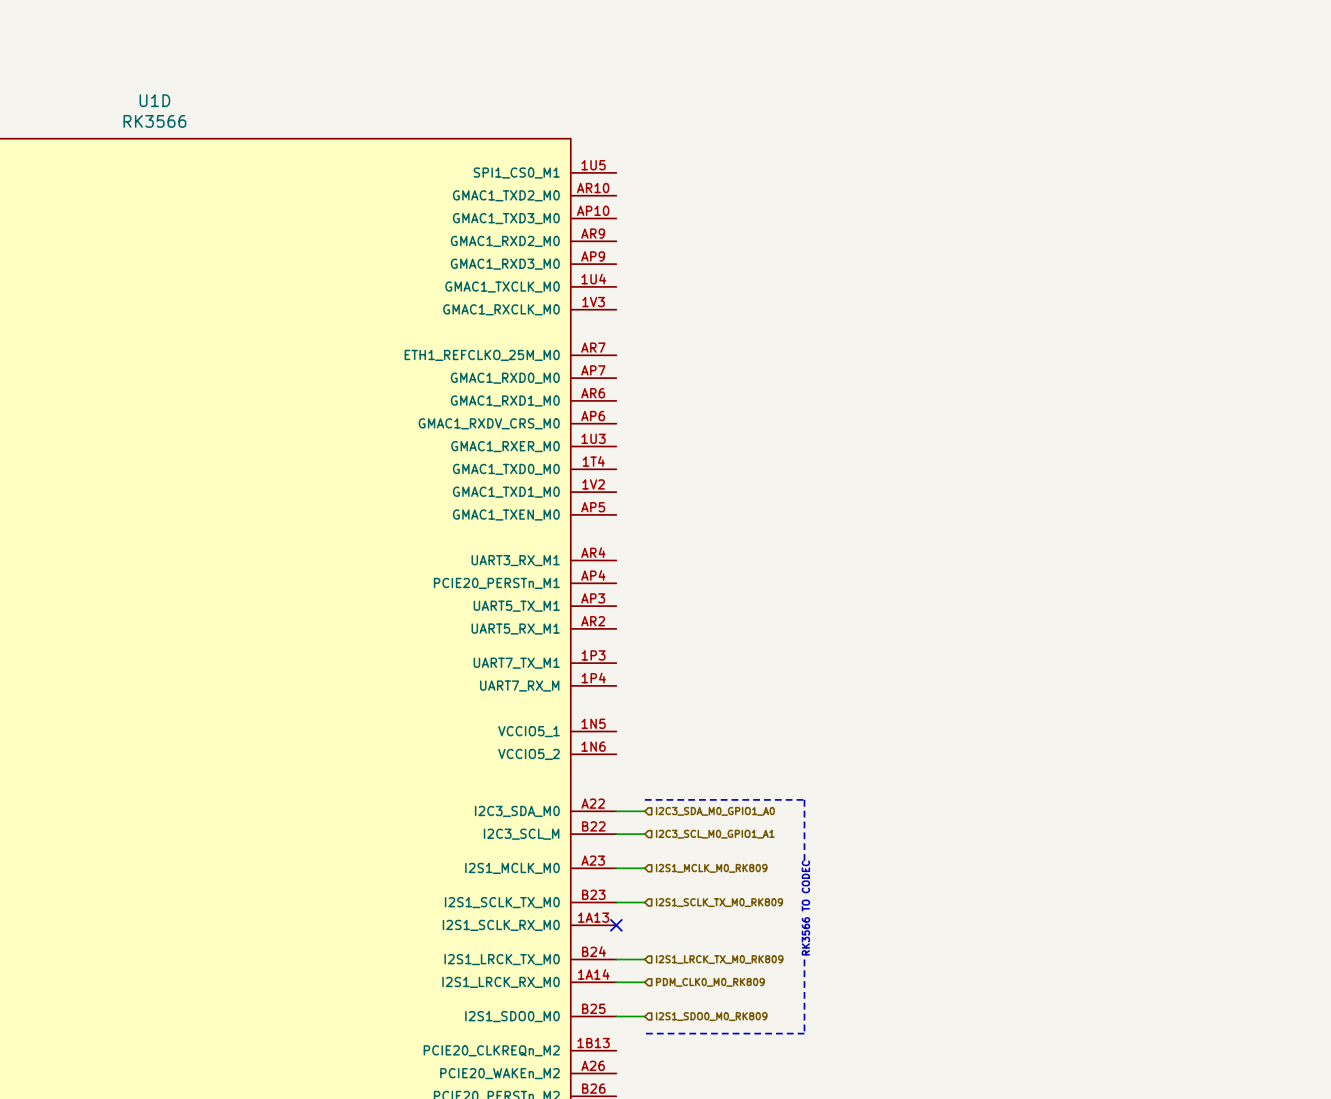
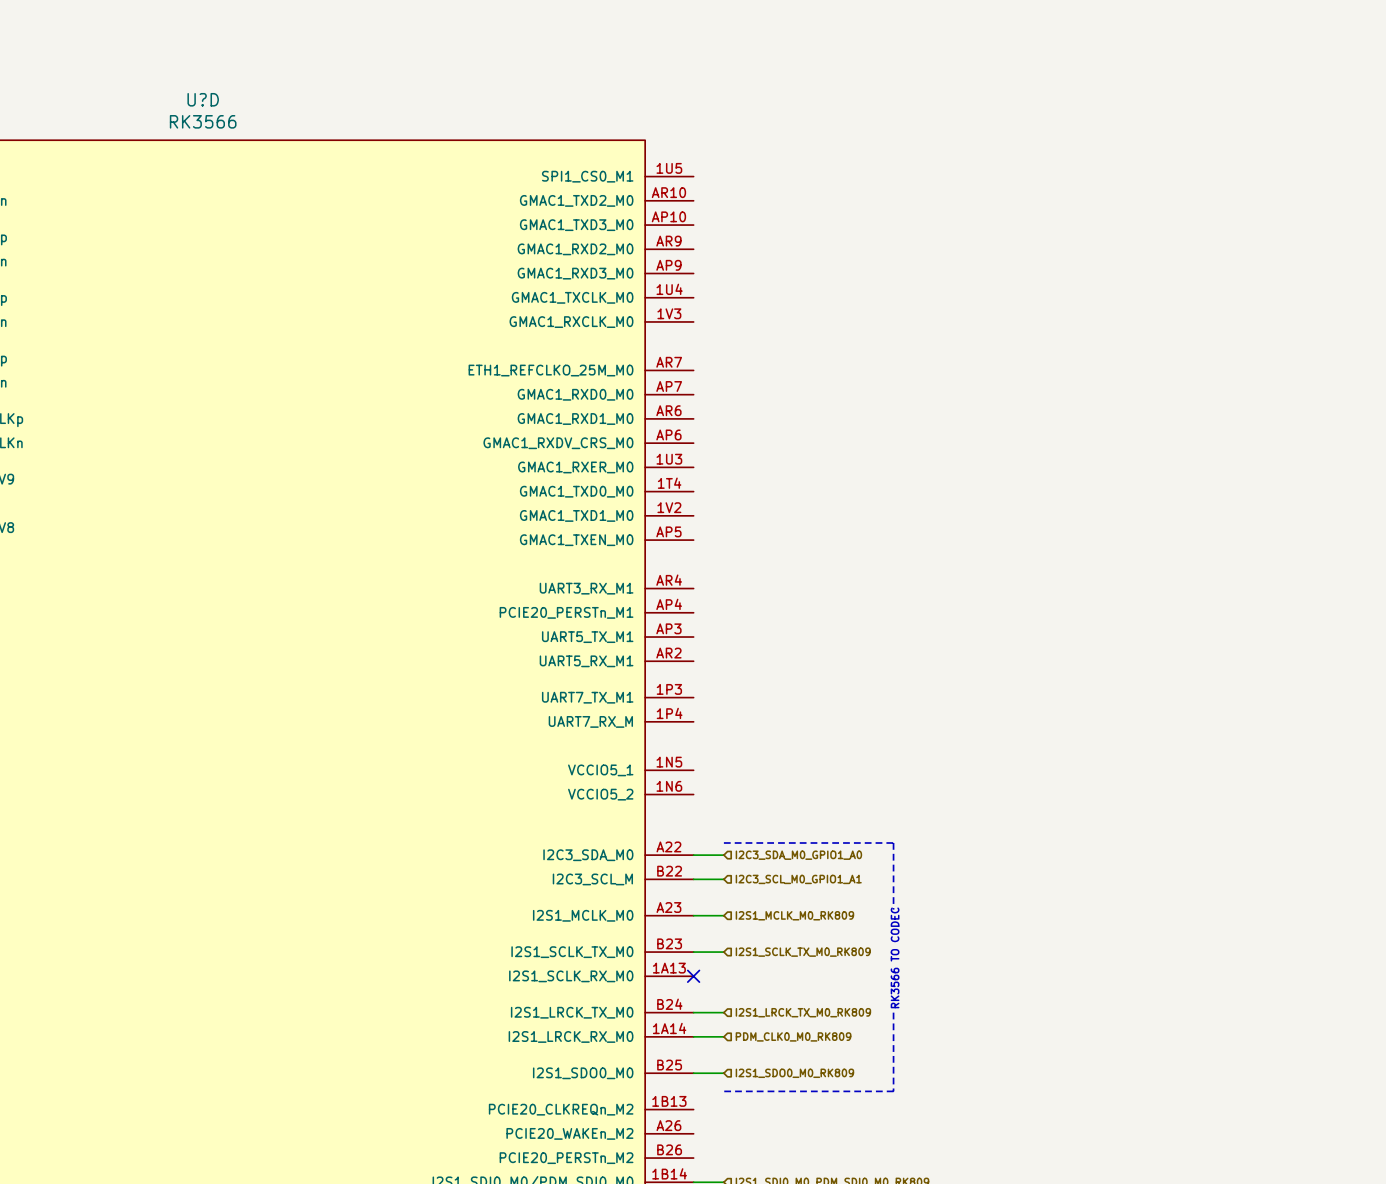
U1D name: U1D (154, 100) -> U?D (203, 99)

